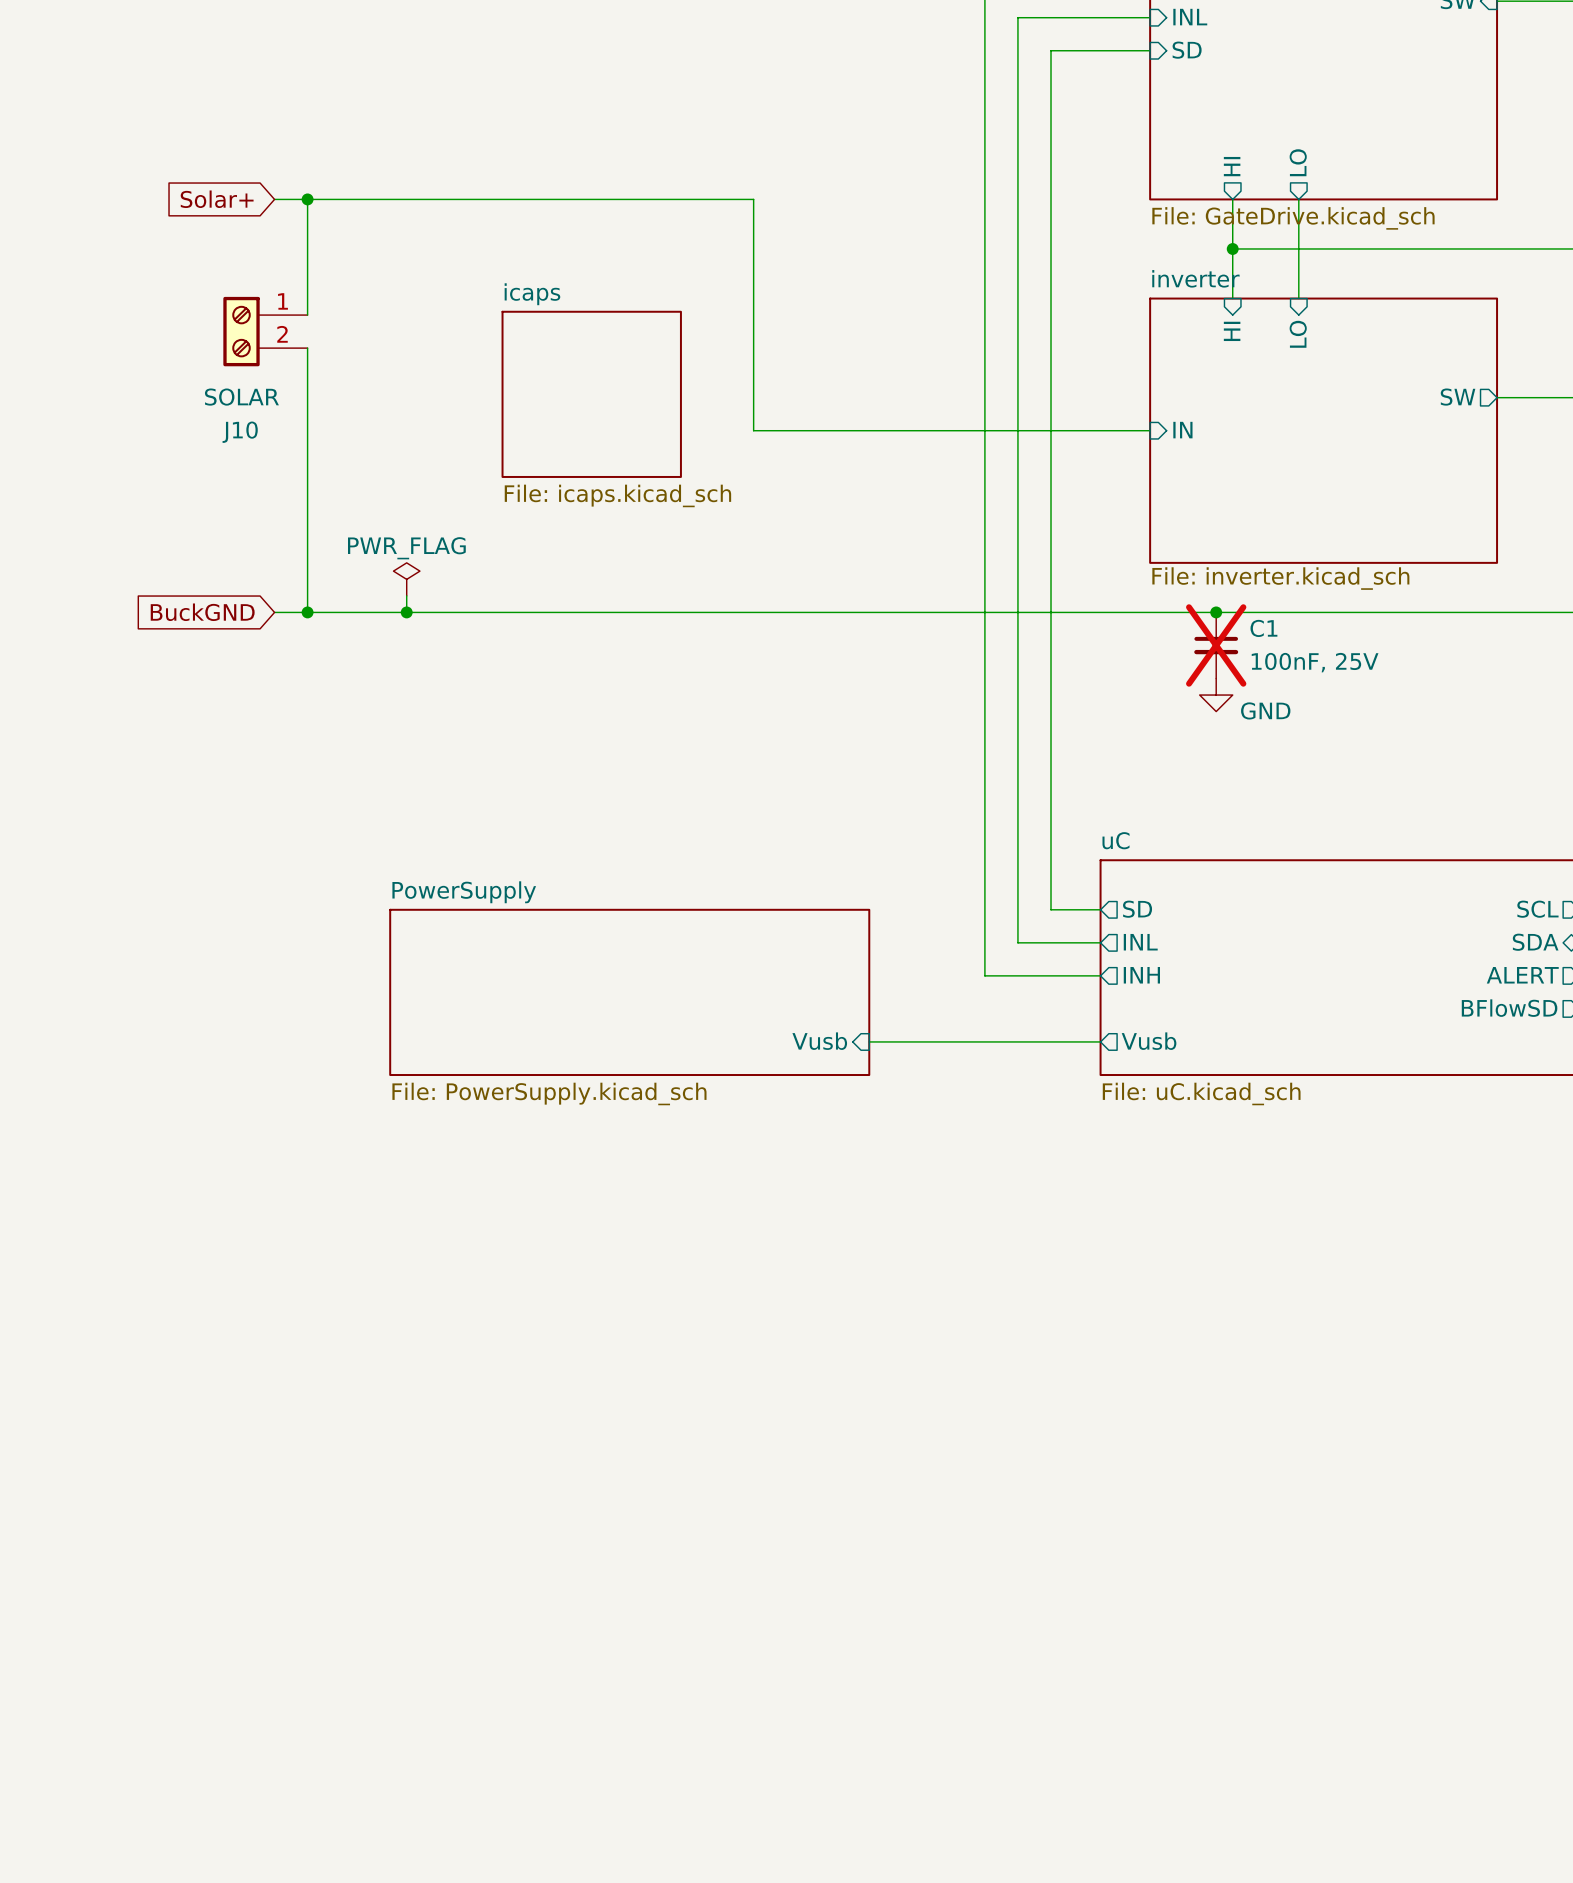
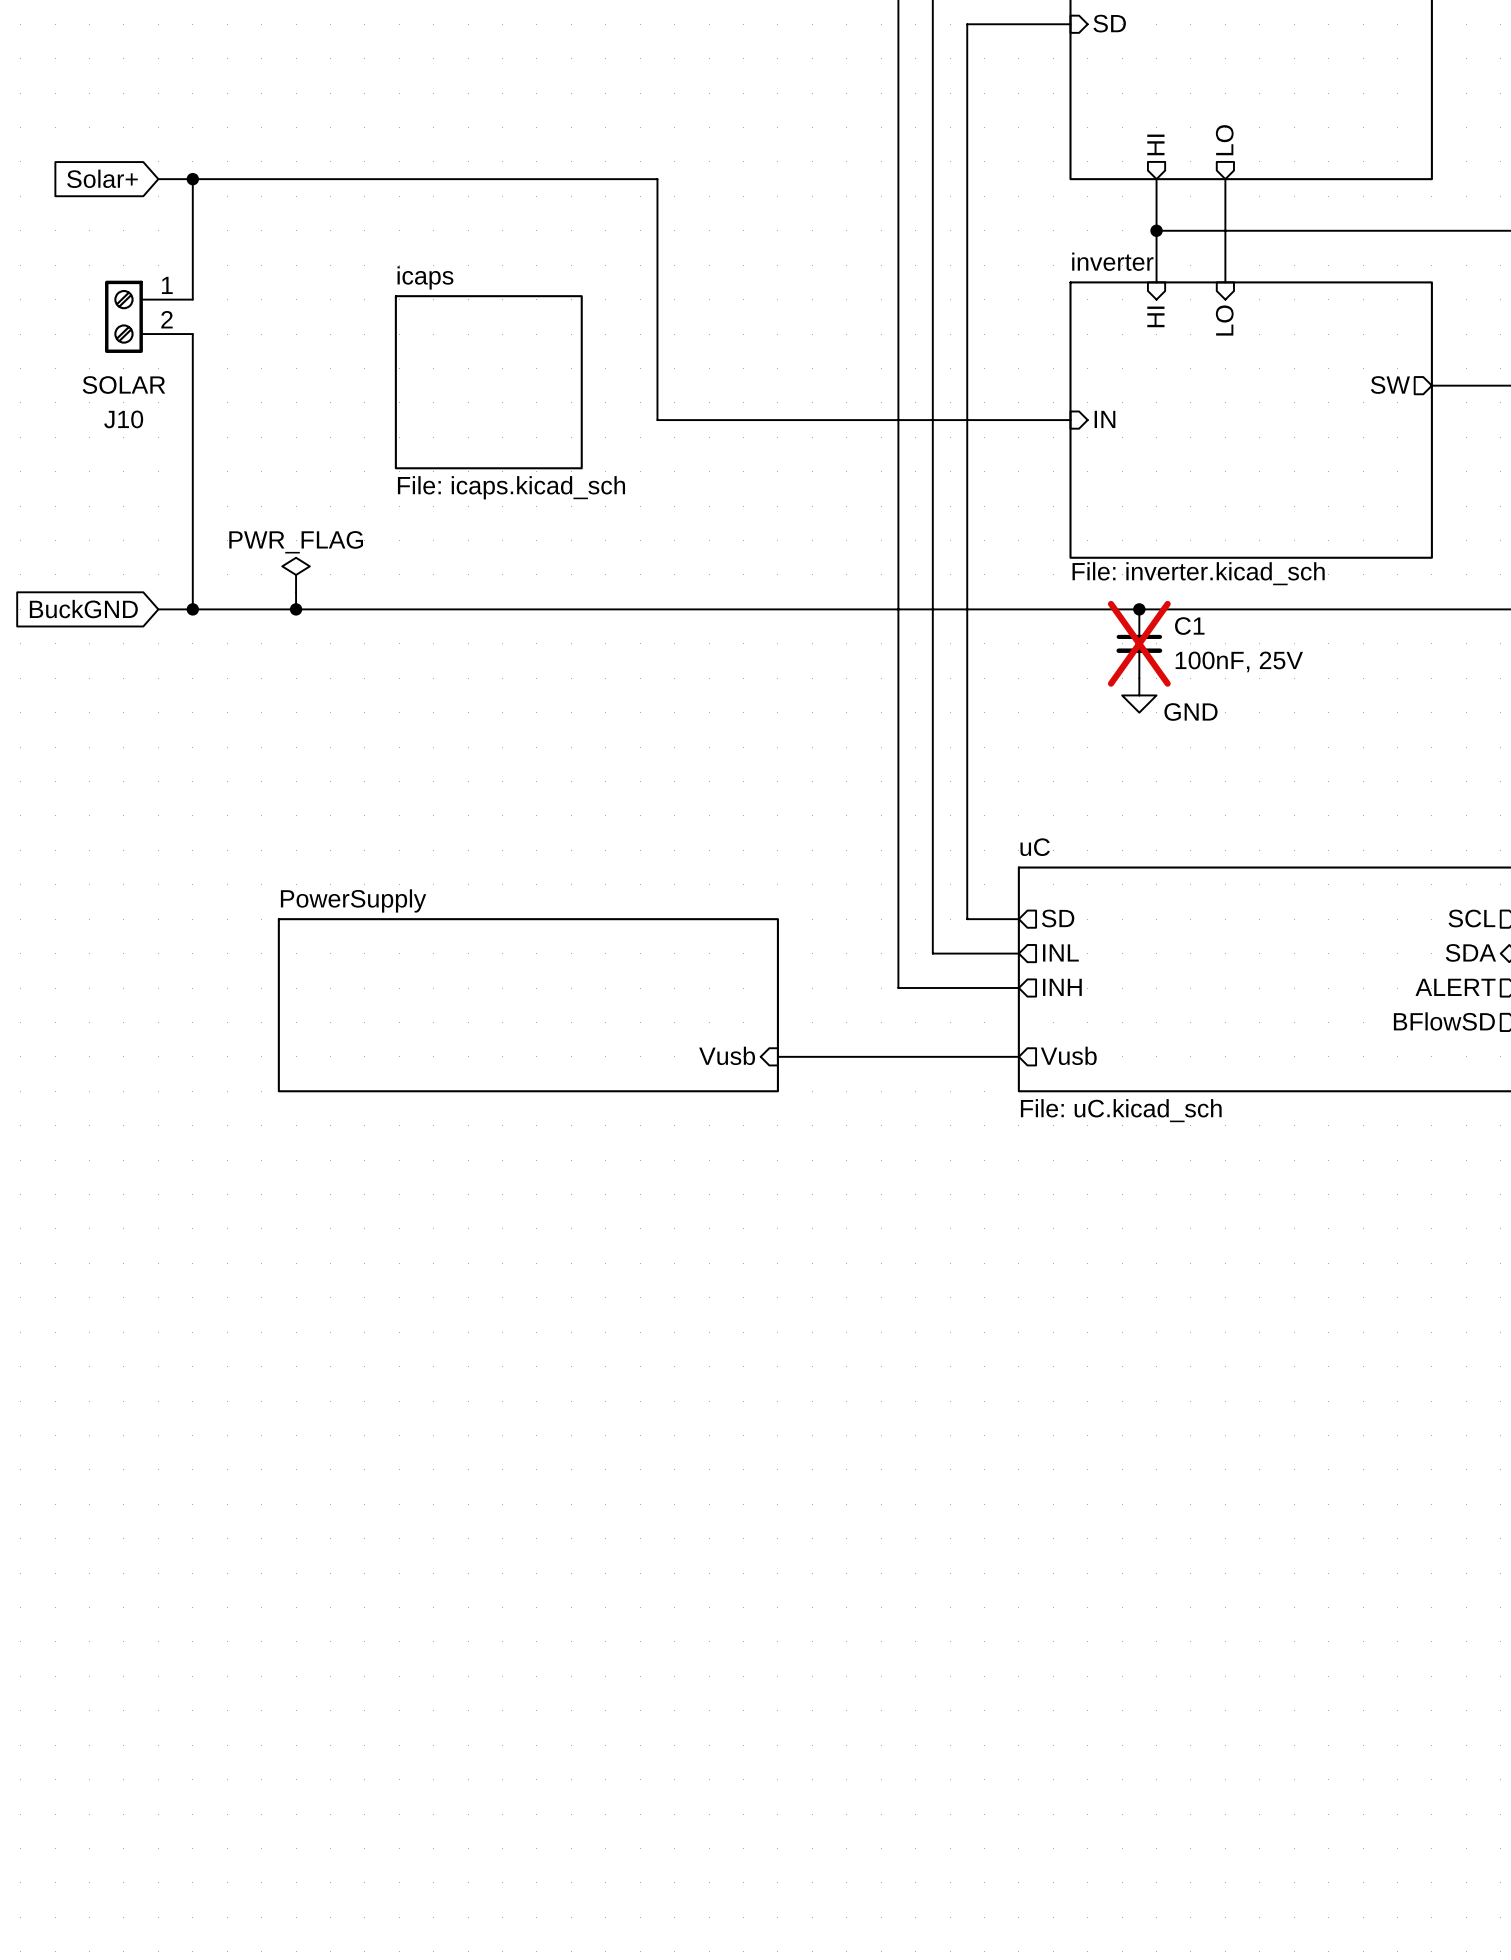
sheet value: File: GateDrive.kicad_sch (1293, 218) -> none
sheet PowerSupply value: File: PowerSupply.kicad_sch (549, 1093) -> none

